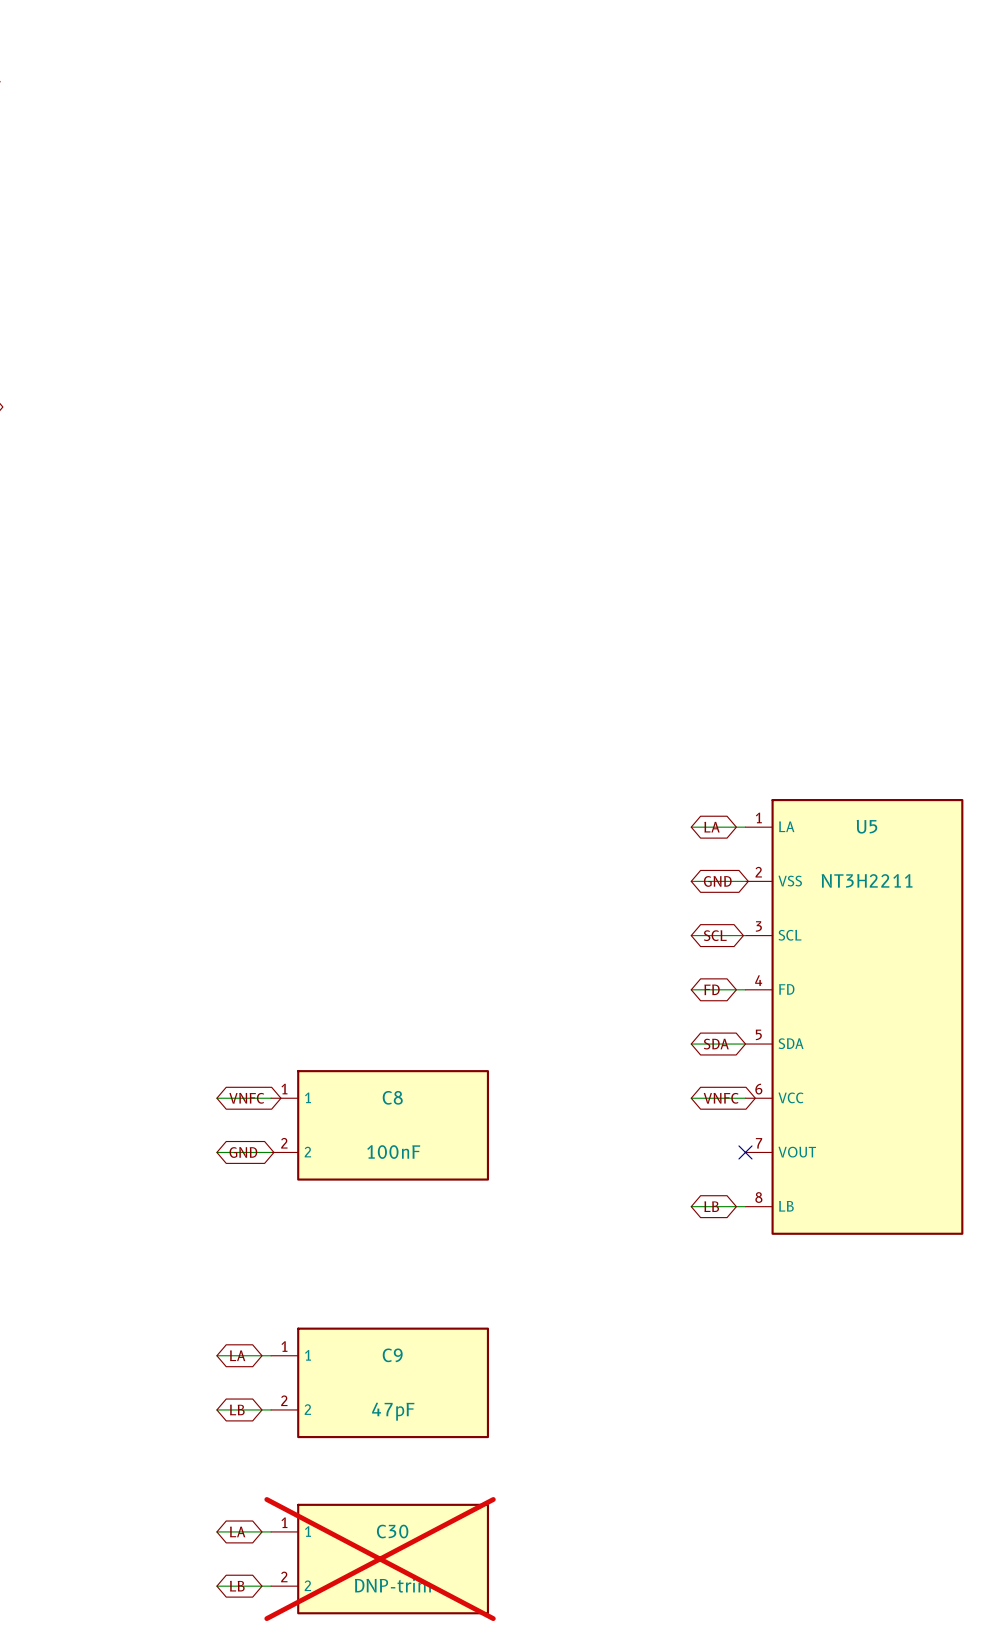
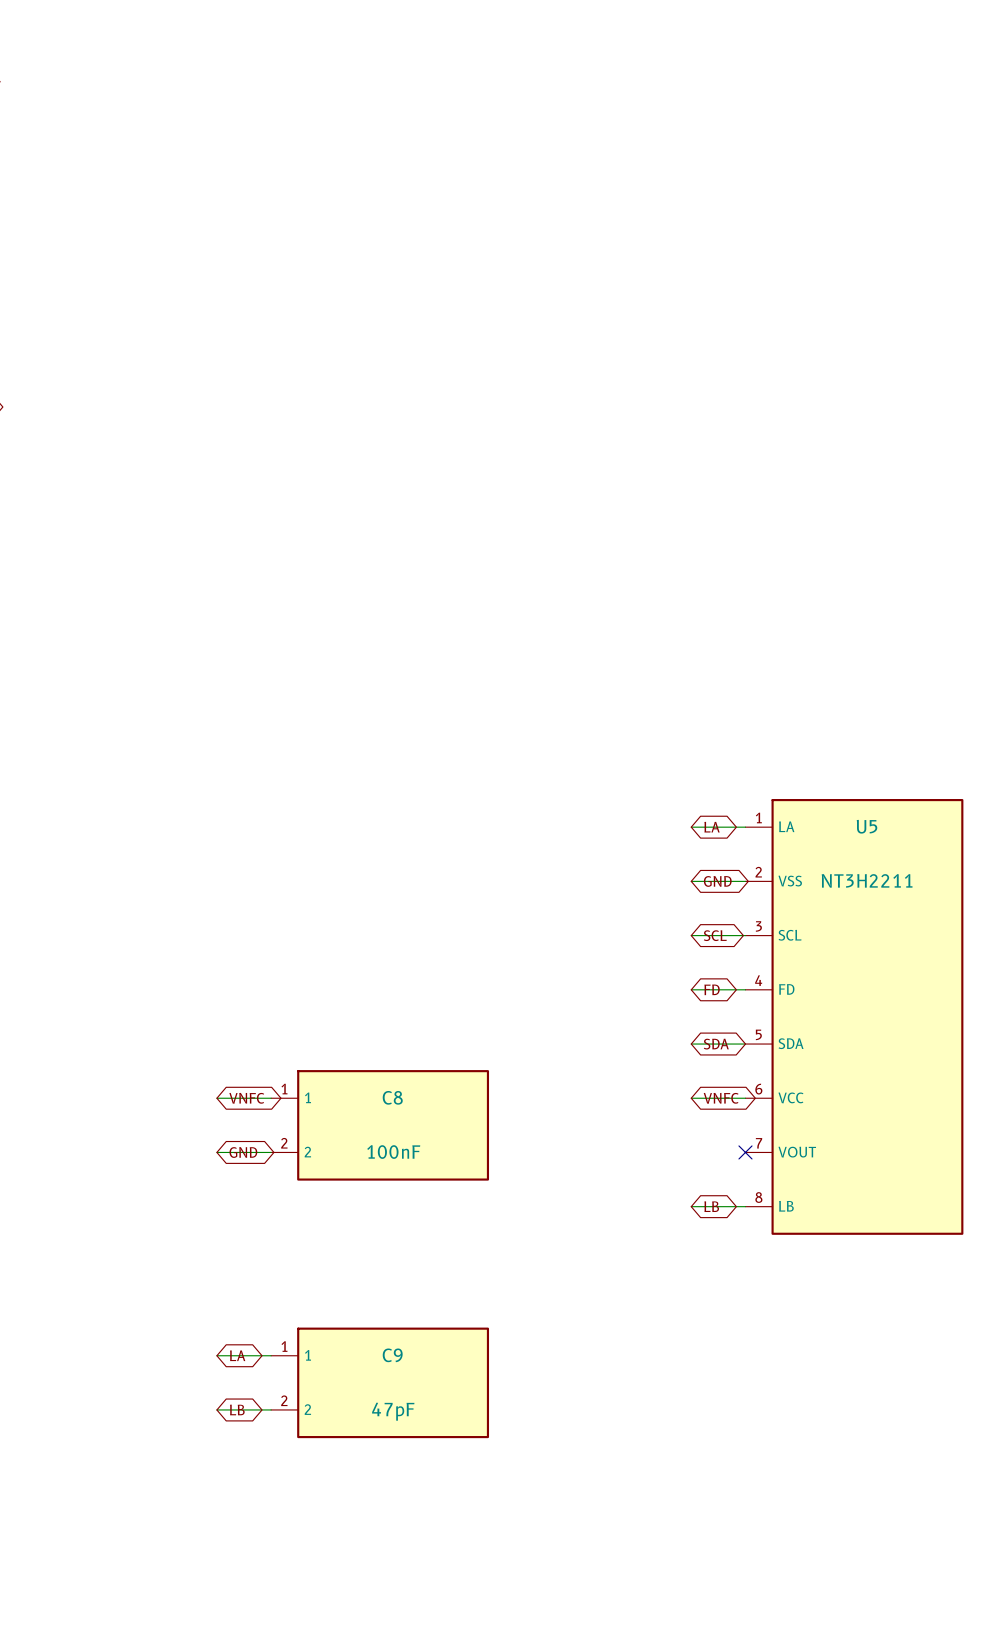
wire: (216, 1531) (271, 1531) -> none
global label: LA (237, 1531) -> none
C30: DNP-trim (380, 1559) -> none
wire: (216, 1586) (271, 1586) -> none
global label: LB (237, 1586) -> none

